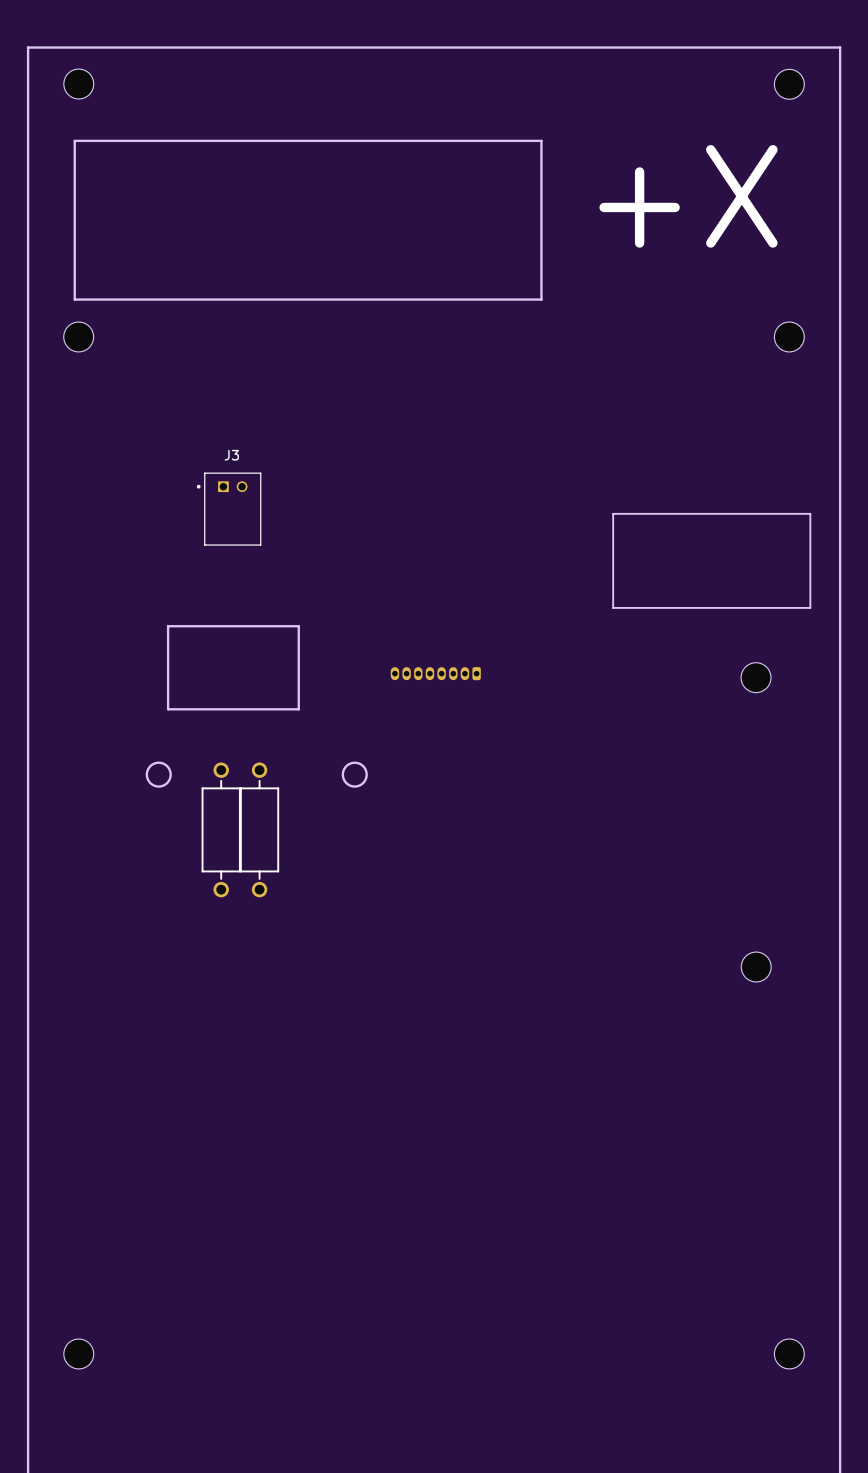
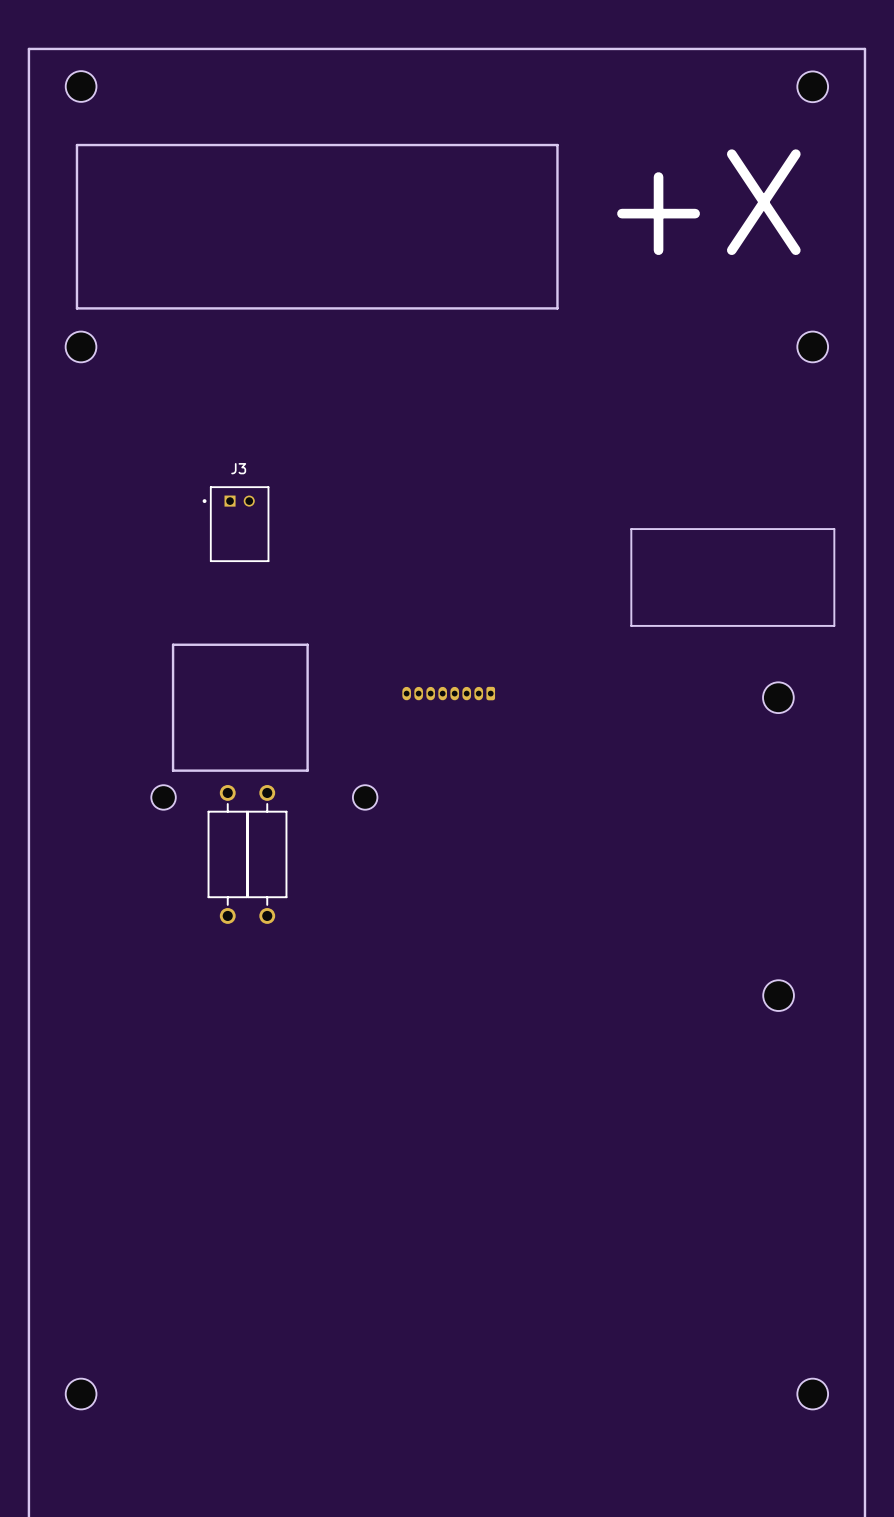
board edge: (168, 709) (298, 709) -> (173, 730) (173, 770) (307, 770) (307, 730)
round board edge: [145, 761, 172, 788] -> none
round board edge: [341, 761, 368, 788] -> none
part: none -> (163, 797)
part: none -> (365, 797)

